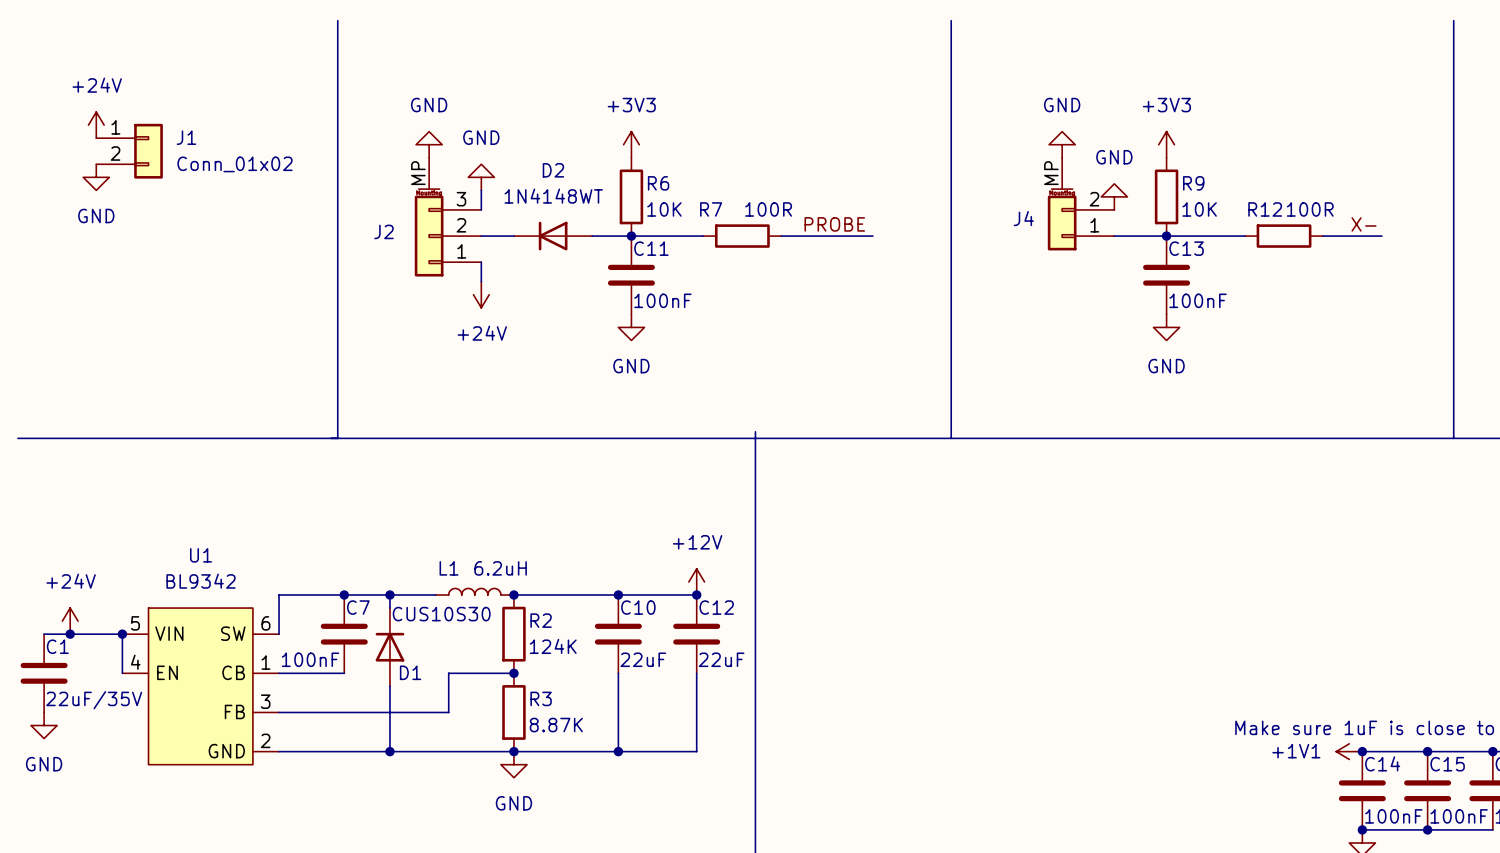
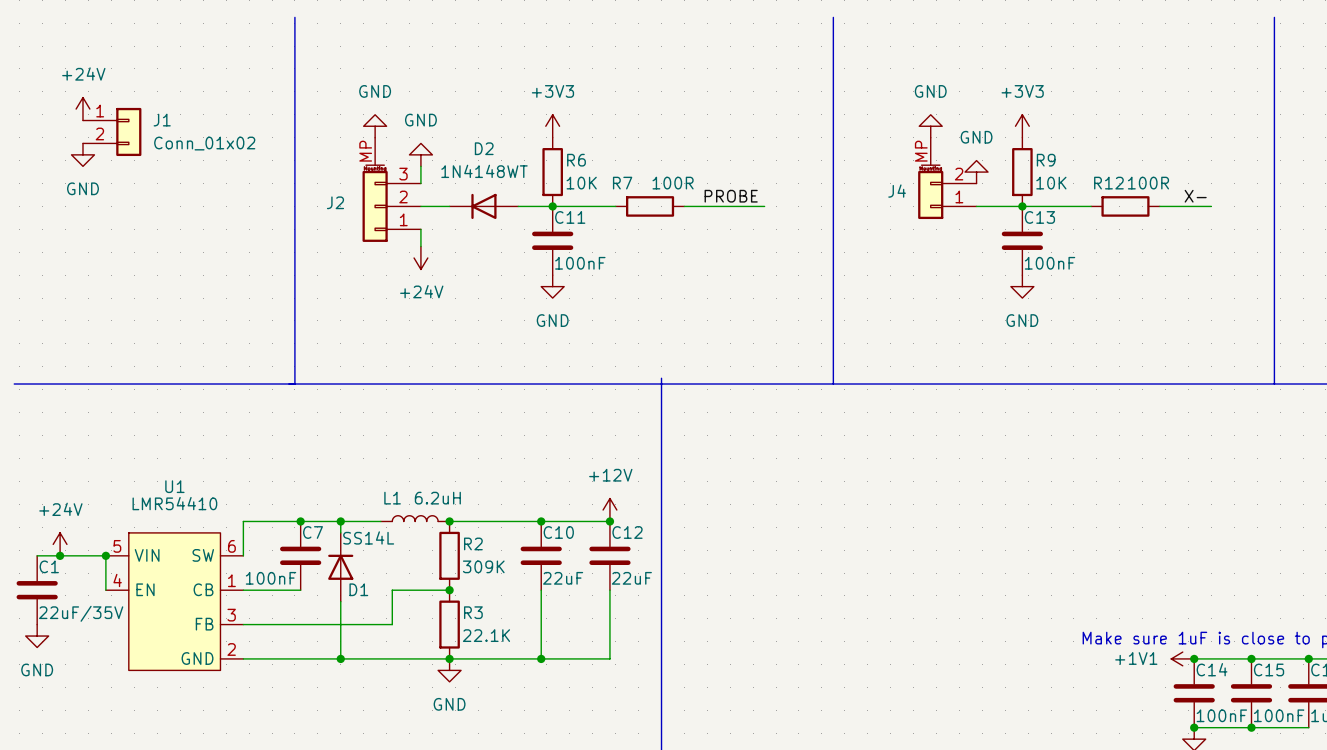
U1 value: BL9342 (201, 581) -> LMR54410 (174, 503)
D1 value: CUS10S30 (441, 614) -> SS14L (368, 537)
R2 value: 124K (553, 646) -> 309K (483, 566)
R3 value: 8.87K (556, 725) -> 22.1K (486, 635)

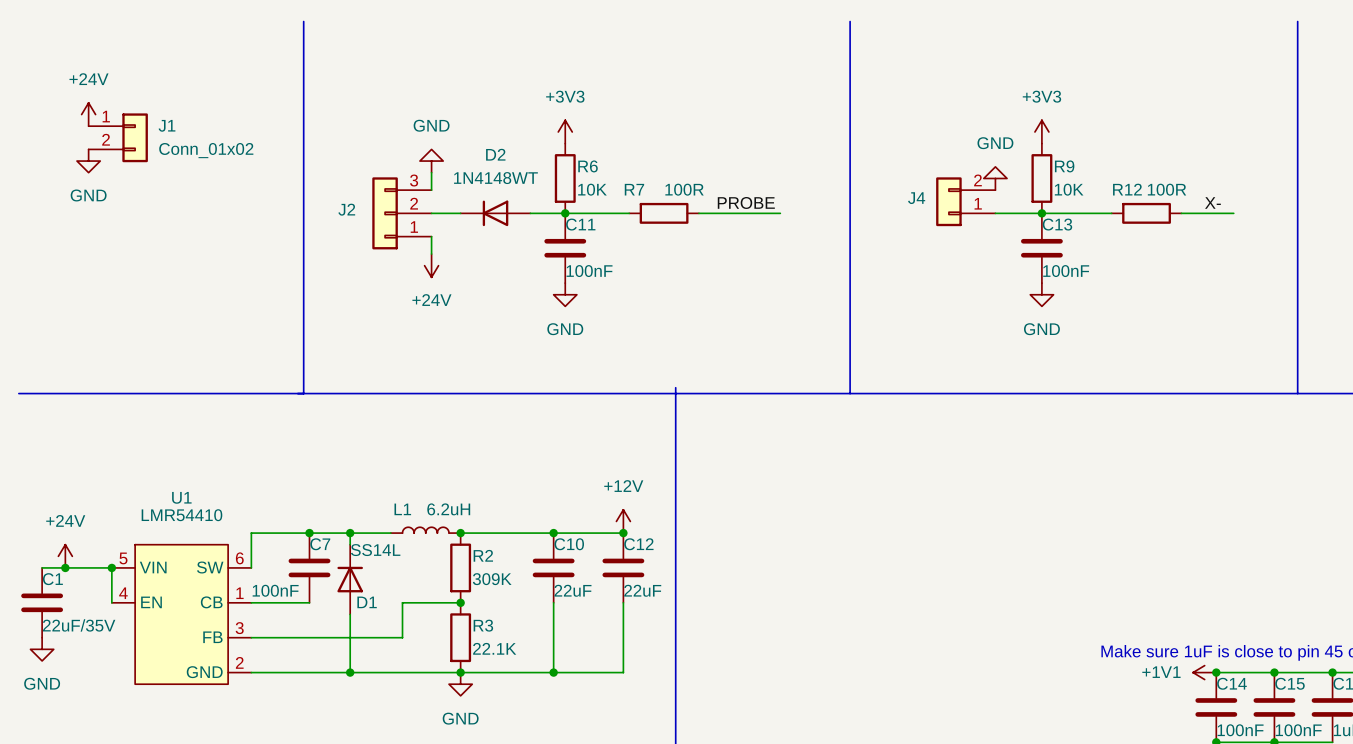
power symbol: GND (375, 126) -> none
power symbol: GND (930, 126) -> none
J2 symbol: [362, 137, 421, 242] -> [372, 177, 432, 250]
J4 symbol: [918, 137, 977, 220] -> [936, 177, 996, 227]

